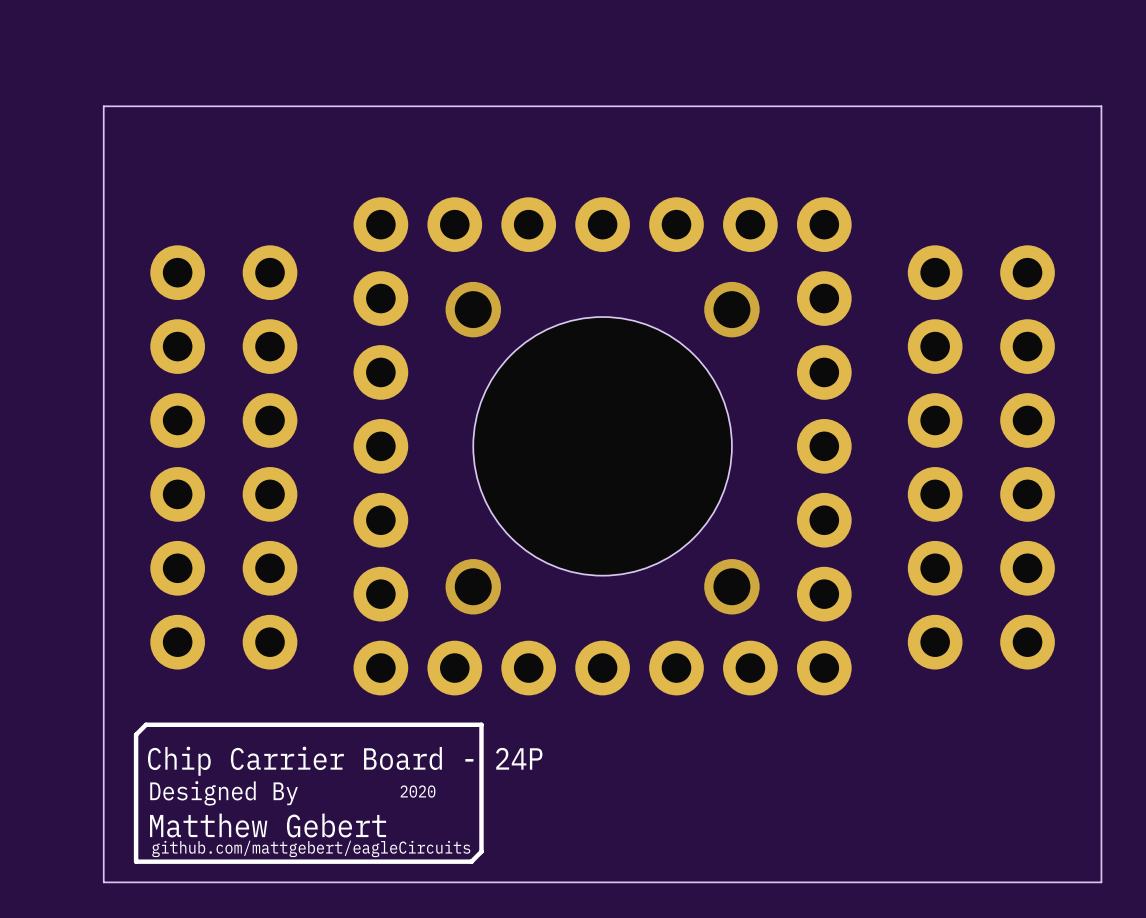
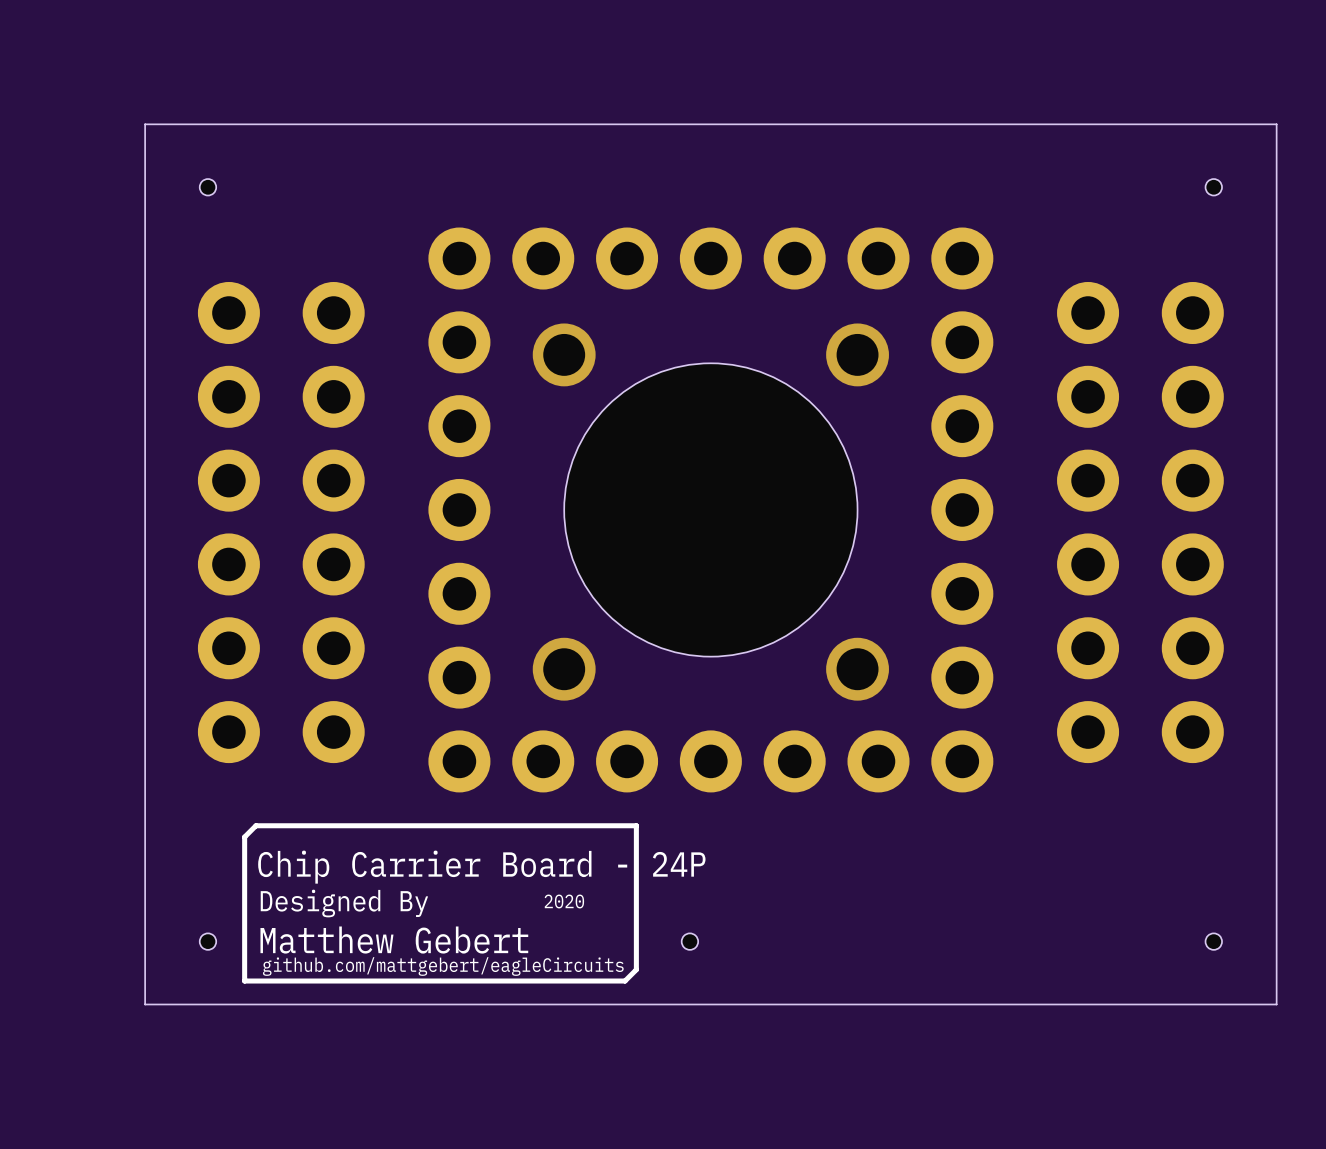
hole: none -> (207, 187)
hole: none -> (1213, 187)
line: (201, 724) (146, 724) (136, 734) (136, 861) (191, 861) -> (255, 825) (244, 837) (244, 981)
line: (481, 724) (481, 851) (471, 861) -> (573, 825) (636, 825) (636, 969) (625, 981) (562, 981)
text position: Chip Carrier Board - 24P (345, 761) -> Chip Carrier Board - 24P (481, 867)
text position: 2020 (418, 791) -> 2020 (564, 901)
text position: Designed By (224, 793) -> Designed By (344, 903)
text position: Matthew Gebert (268, 825) -> Matthew Gebert (394, 940)
hole: none -> (207, 941)
hole: none -> (689, 941)
hole: none -> (1213, 941)
text position: github.com/mattgebert/eagleCircuits (311, 848) -> github.com/mattgebert/eagleCircuits (443, 966)

